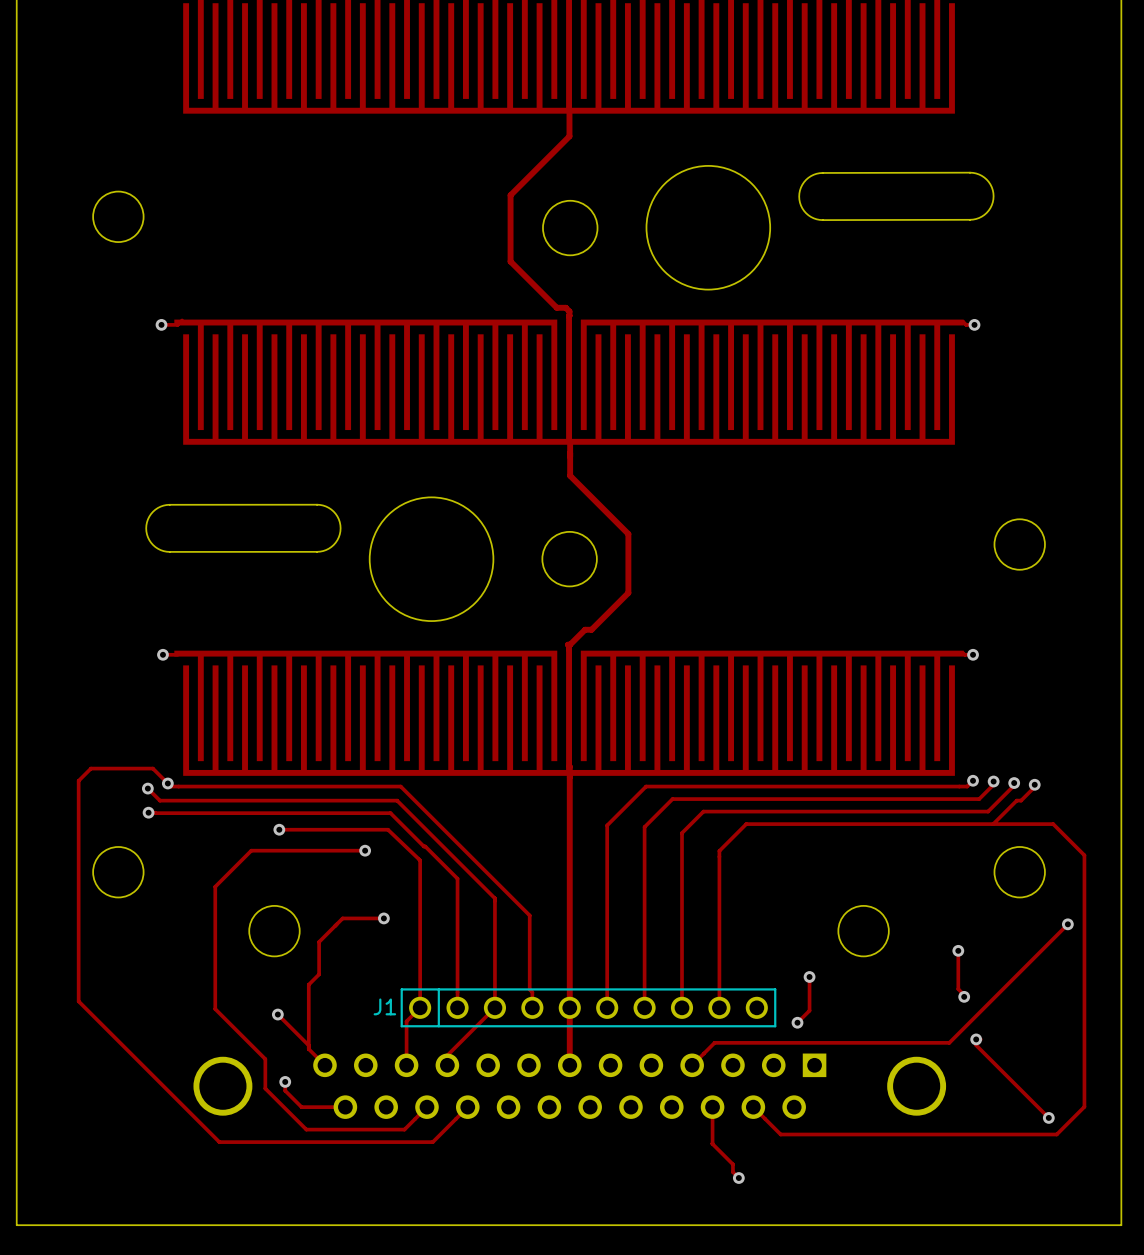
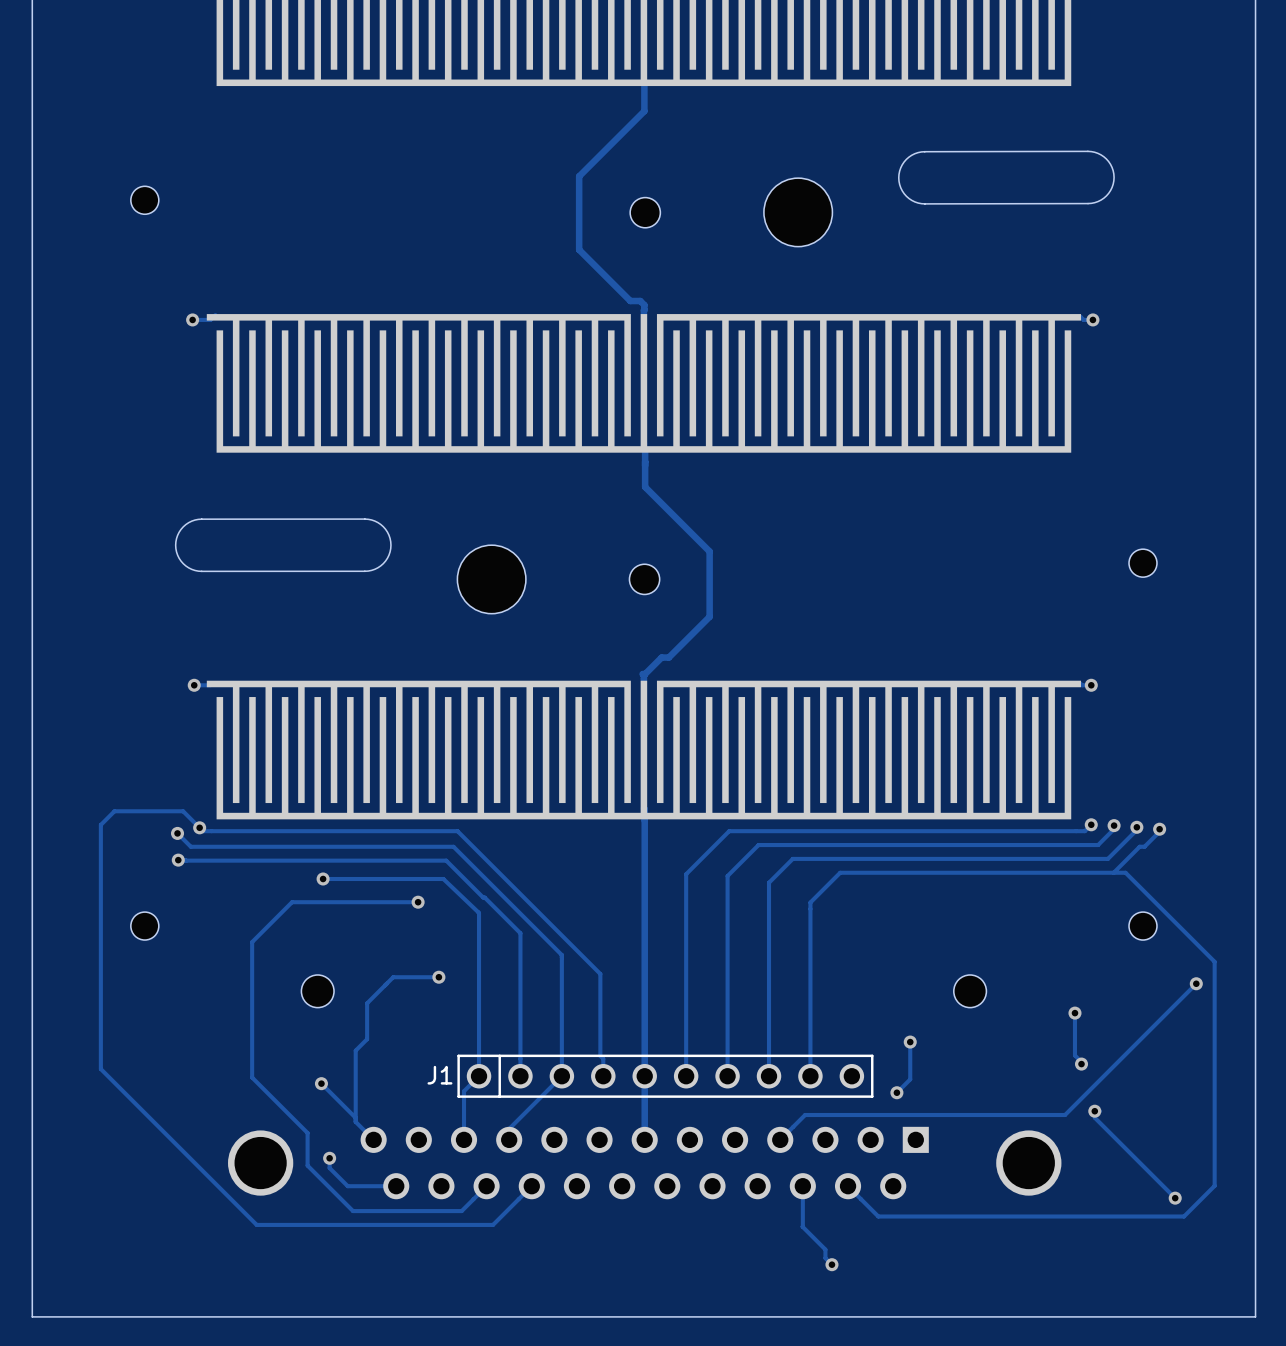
round board edge: [646, 165, 771, 290] -> none
round board edge: [93, 191, 144, 243] -> none
round board edge: [542, 200, 598, 256] -> none
part: none -> (144, 200)
part: none -> (798, 212)
part: none -> (645, 212)
round board edge: [369, 497, 494, 622] -> none
round board edge: [994, 519, 1045, 570] -> none
round board edge: [542, 531, 597, 587] -> none
part: none -> (1142, 563)
part: none -> (491, 579)
part: none -> (644, 579)
track: (1004, 824) (1053, 824) (1084, 855) (1084, 904) -> (1125, 872) (1214, 961)
round board edge: [93, 846, 144, 898] -> none
round board edge: [994, 846, 1045, 898] -> none
part: none -> (144, 926)
part: none -> (1142, 926)
round board edge: [249, 905, 300, 957] -> none
round board edge: [838, 905, 889, 957] -> none
part: none -> (317, 991)
part: none -> (970, 991)

